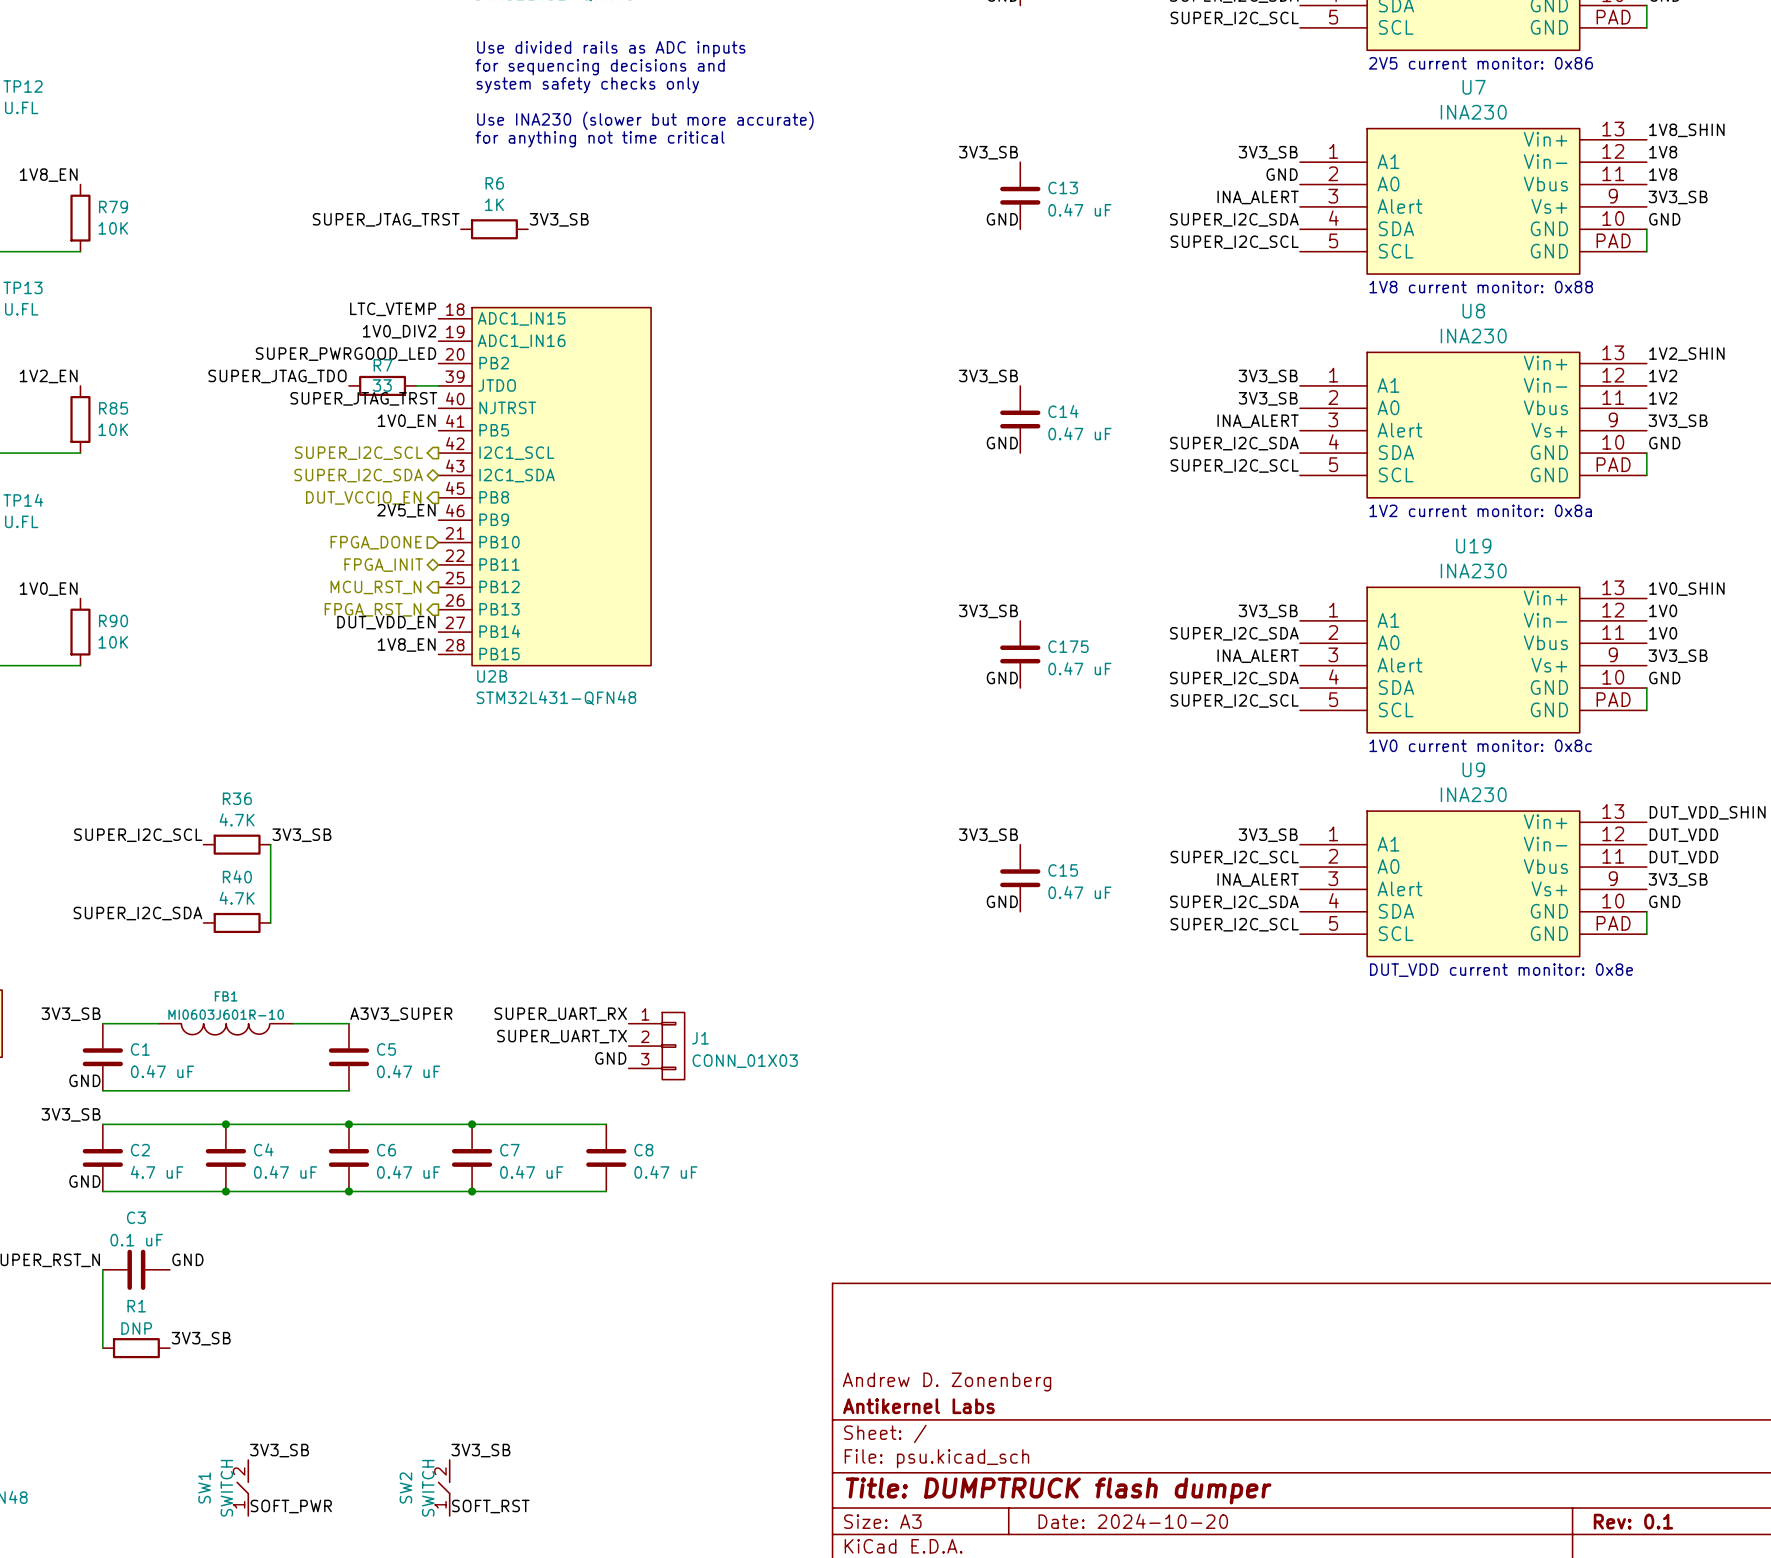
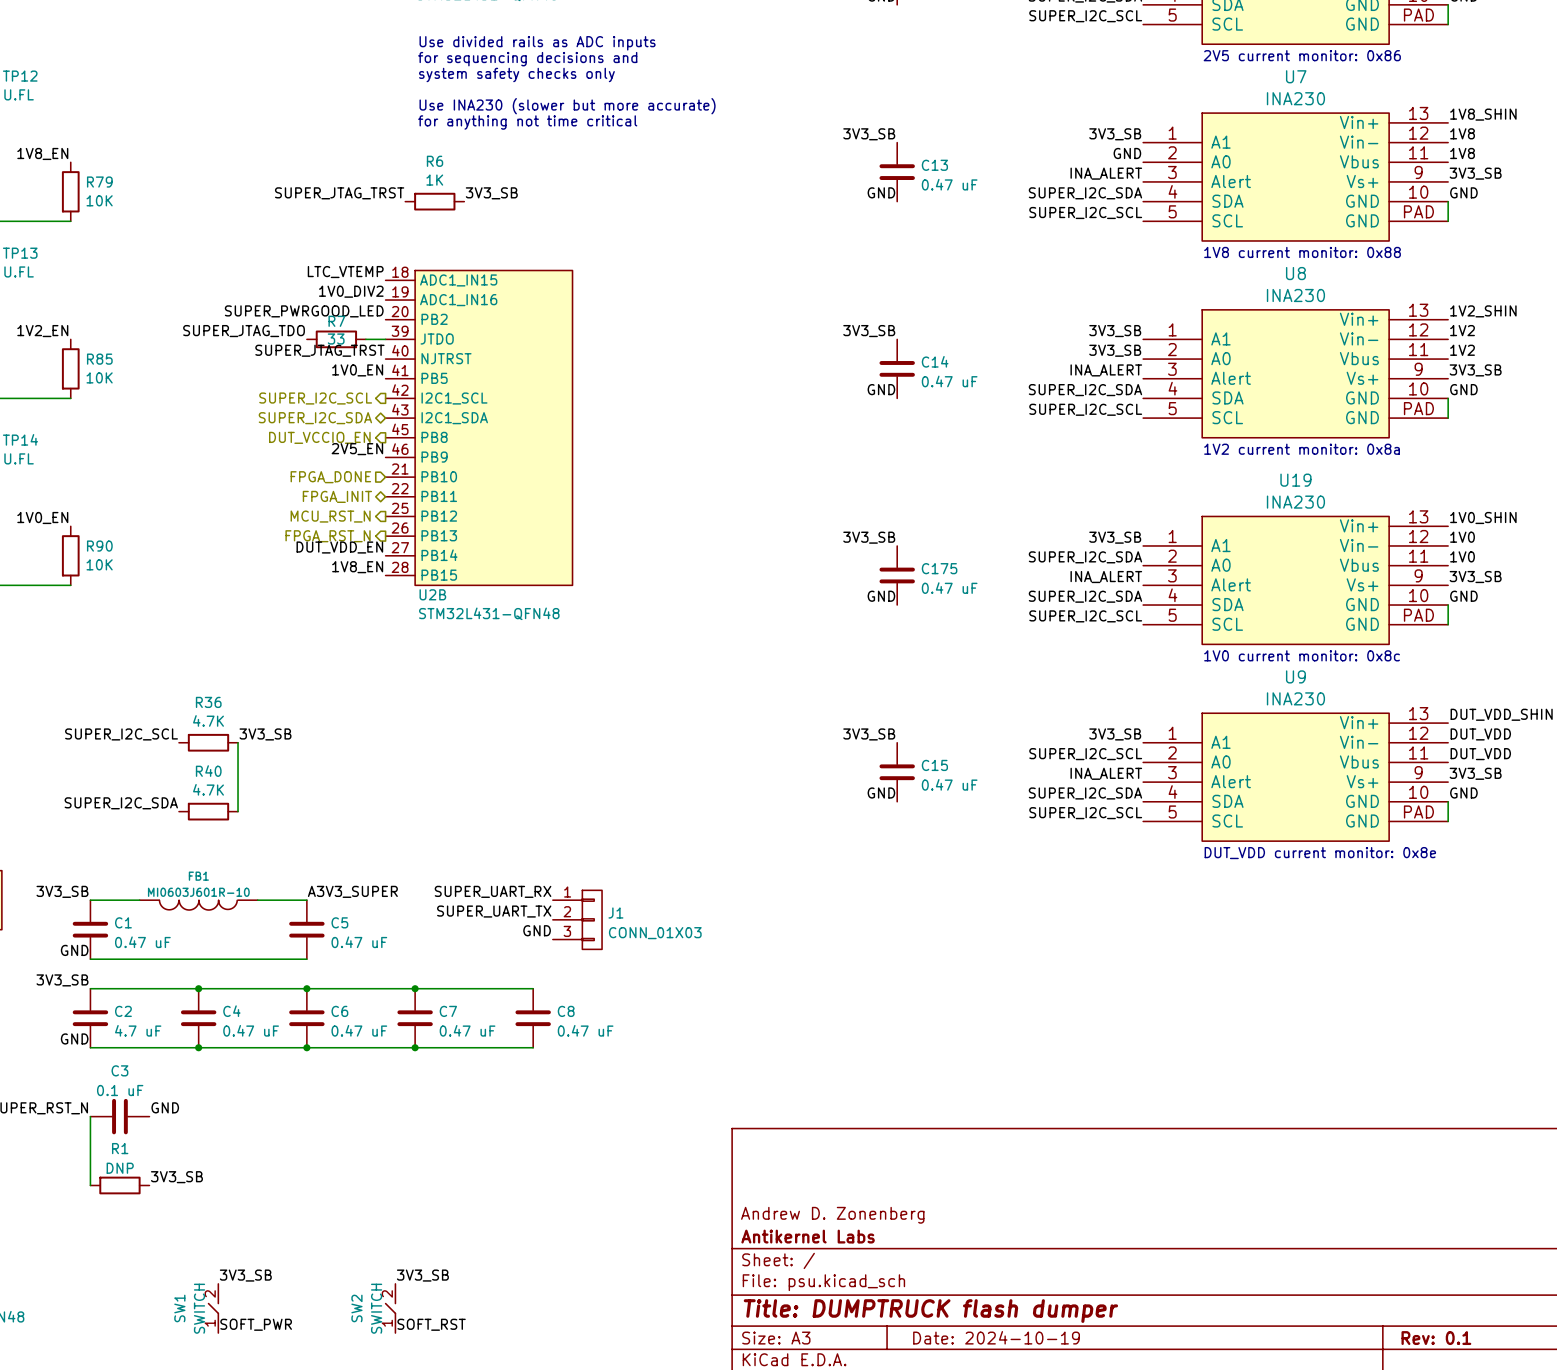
title block: Date: 2024-10-20 (1133, 1521) -> Date: 2024-10-19 (996, 1337)

